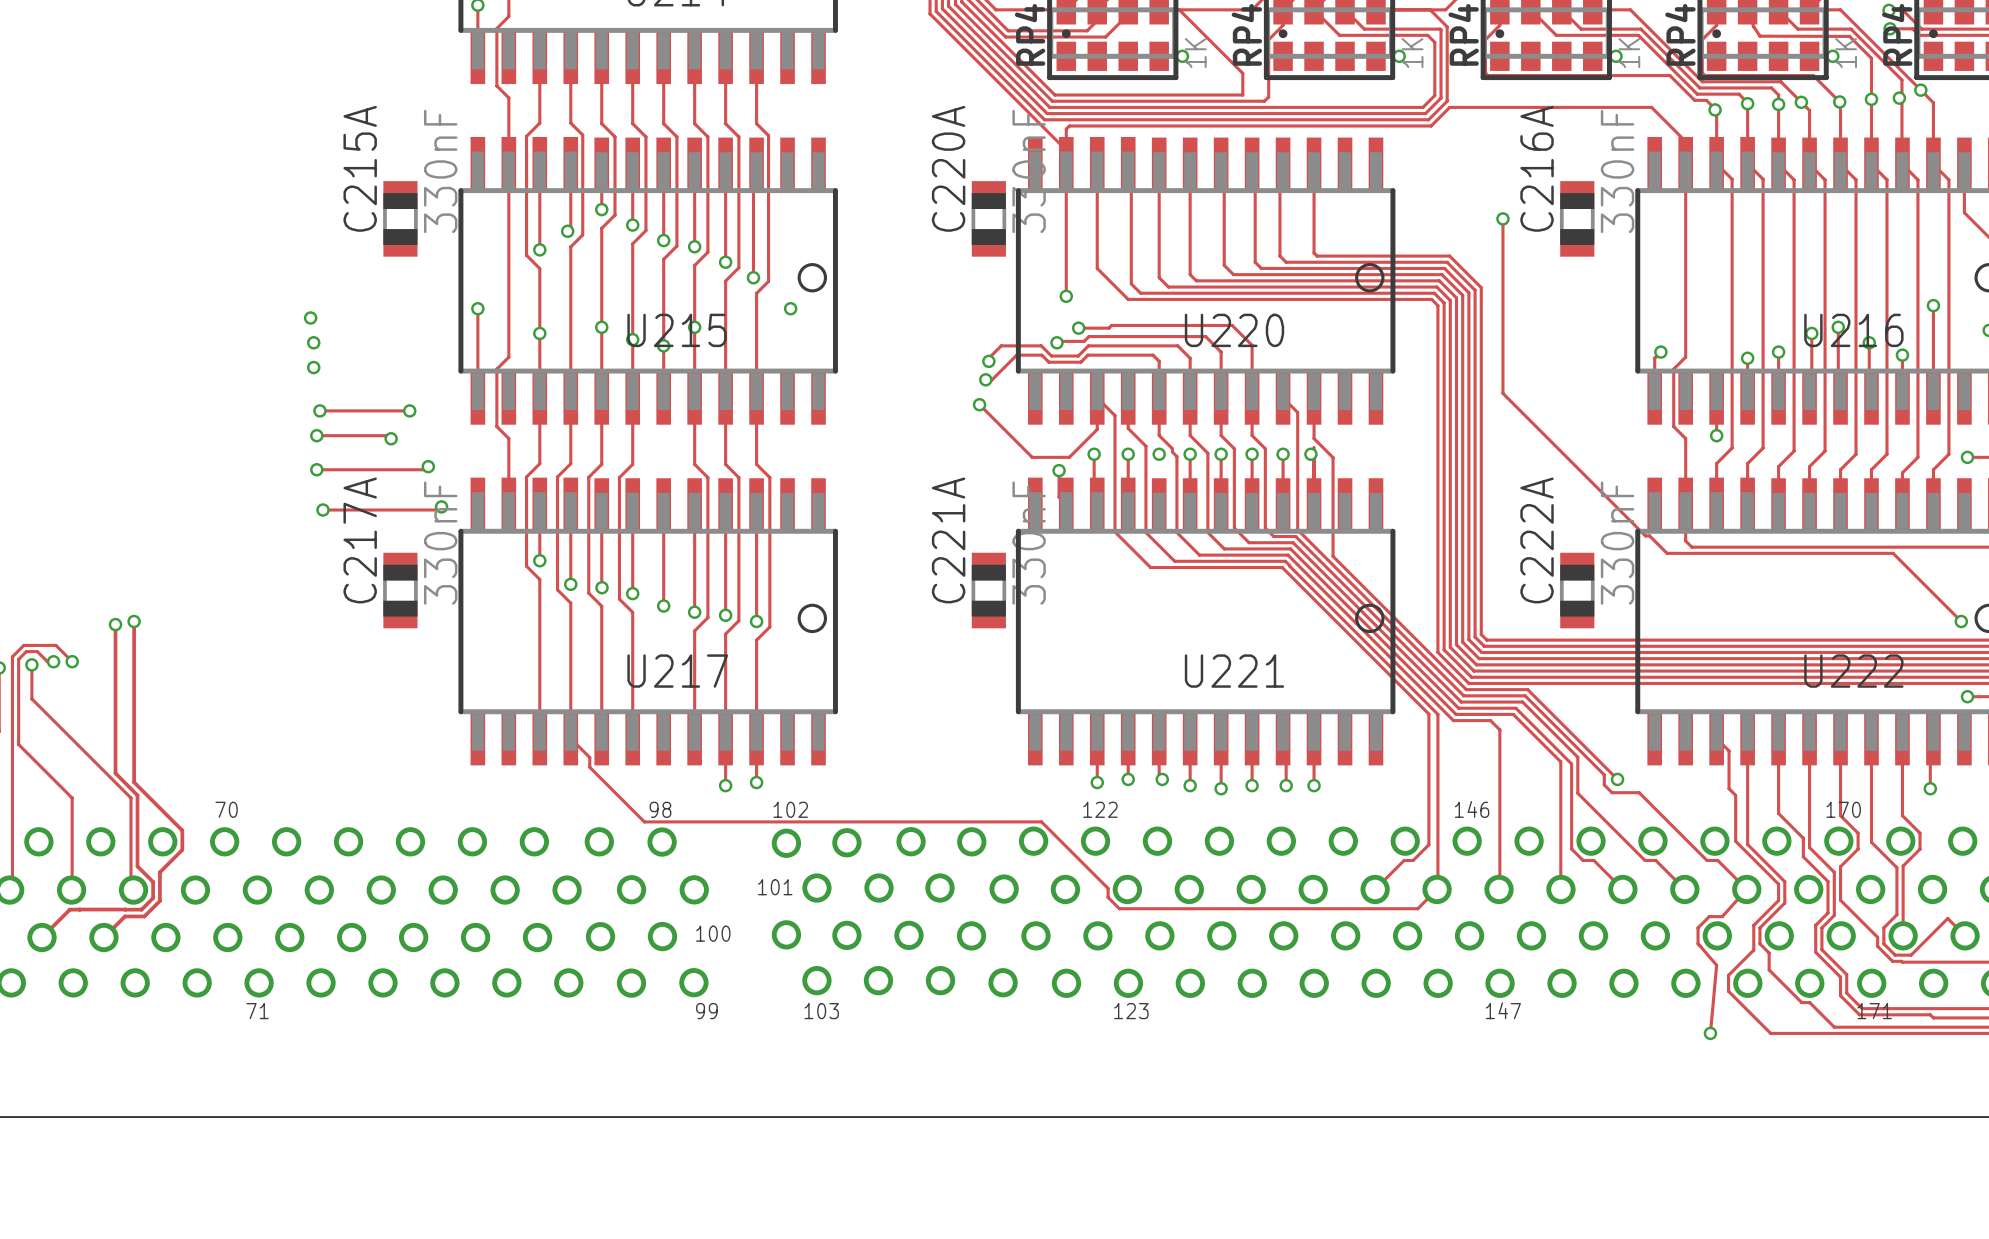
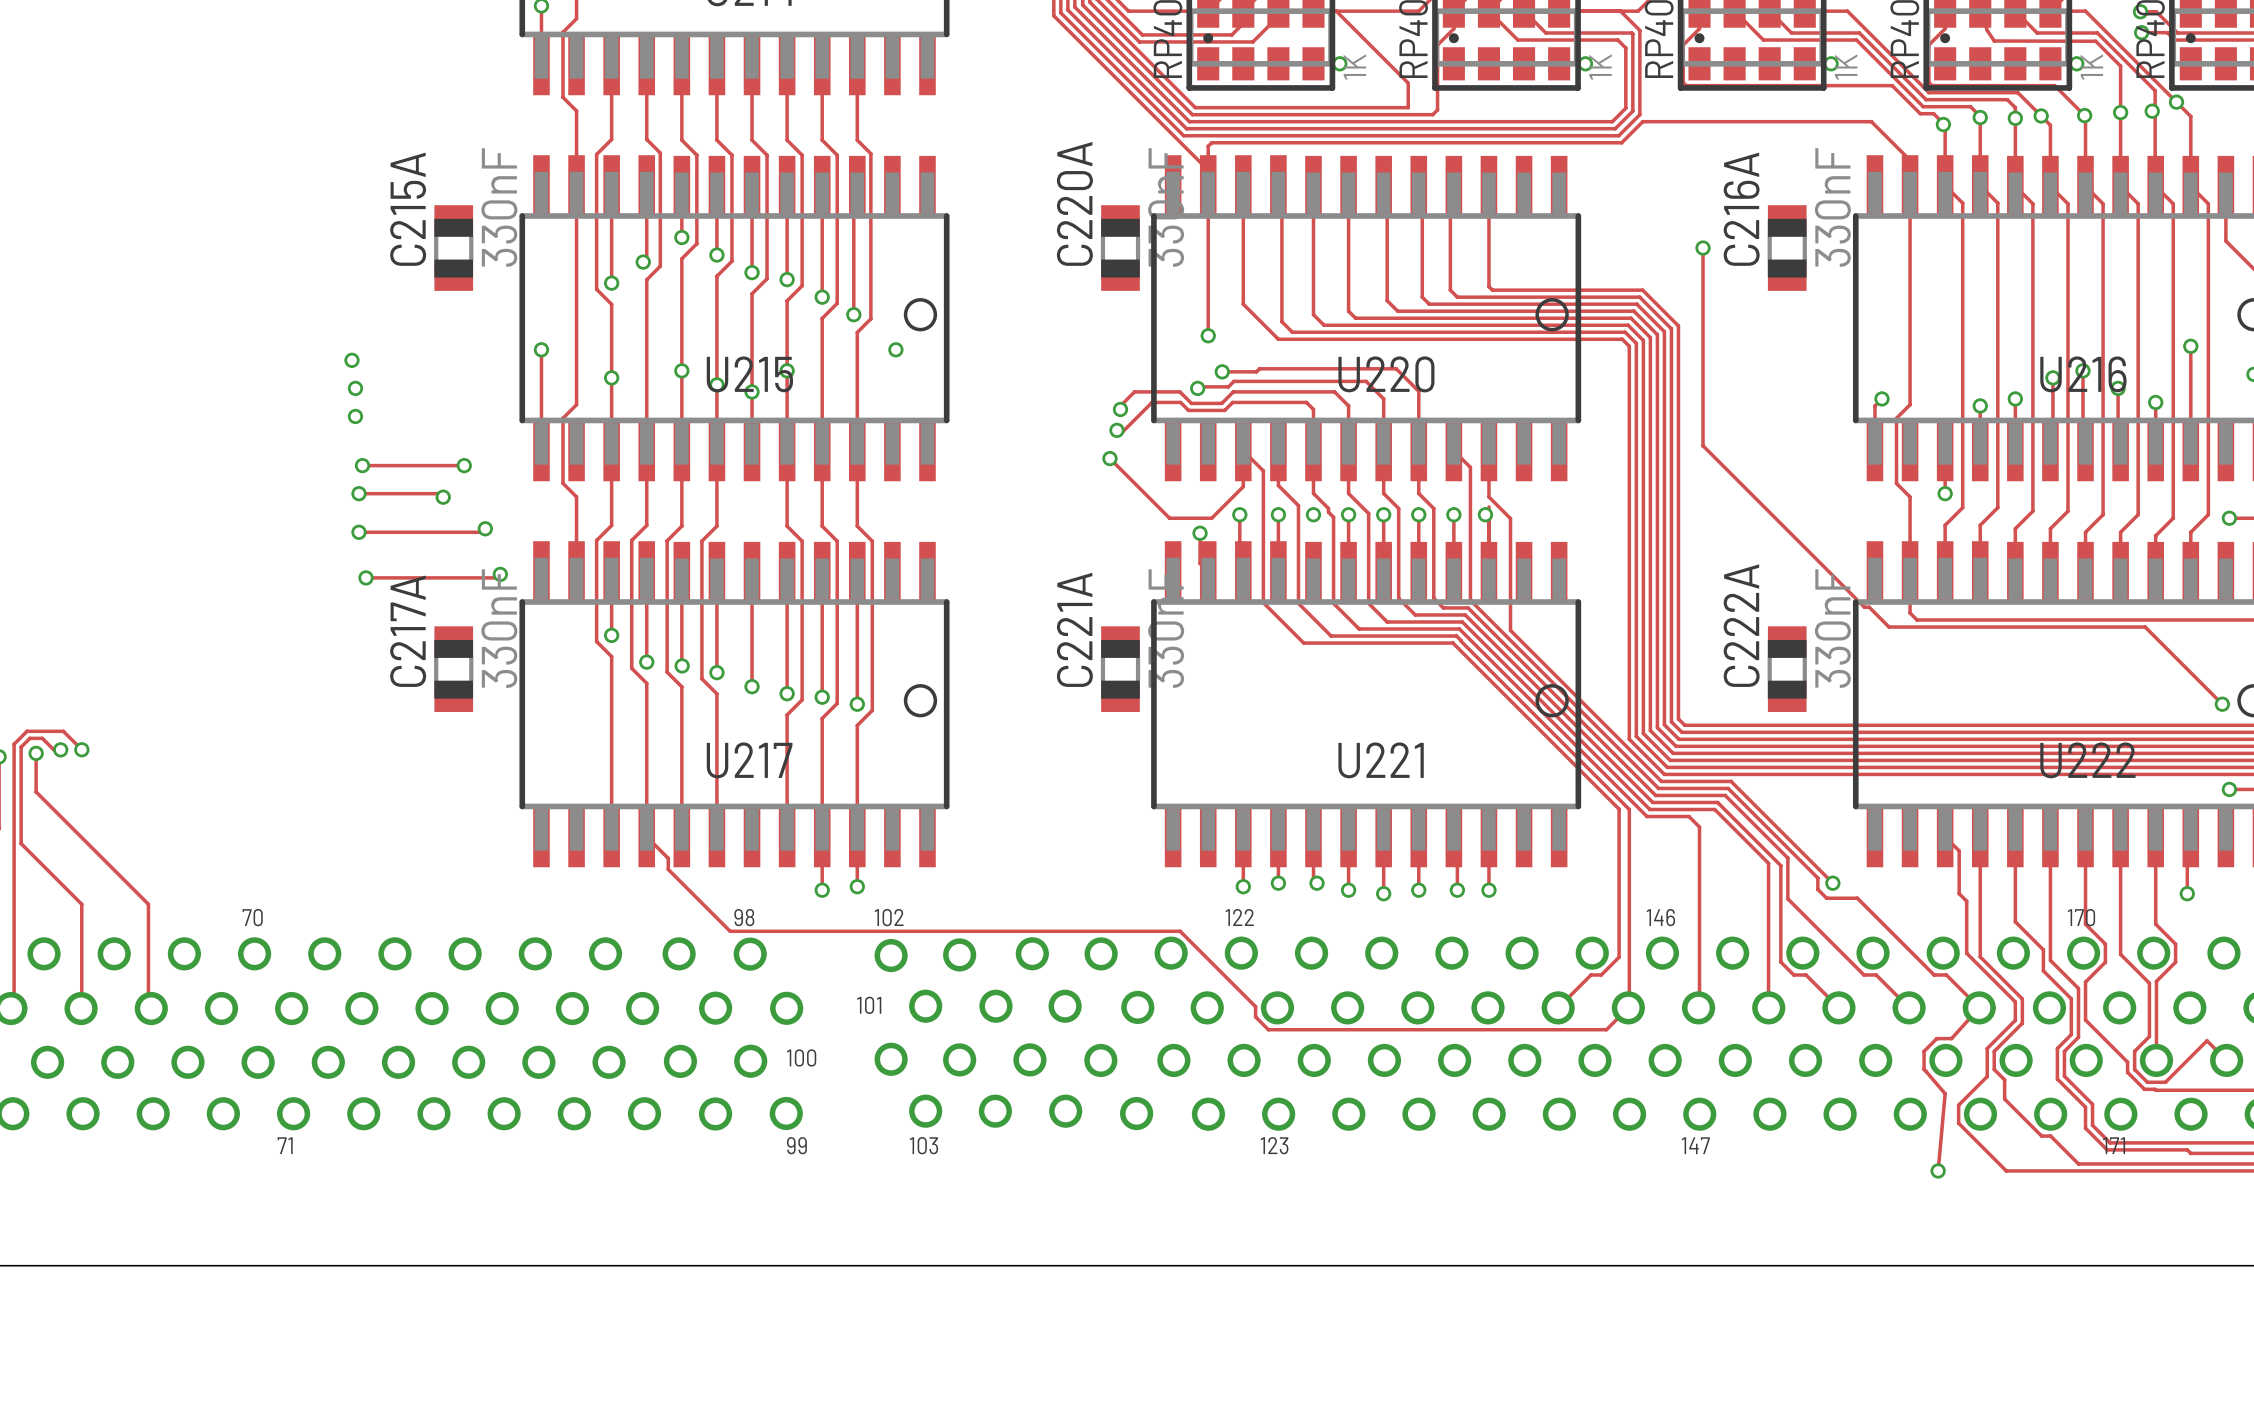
track: (134, 621) (134, 782) (182, 830) (182, 849) (159, 872) (159, 900) (144, 916) (124, 916) (103, 937) -> none
via: (134, 621) -> none
track: (115, 624) (115, 773) (137, 795) (137, 866) (153, 881) (153, 898) (141, 909) (125, 909) -> none
via: (115, 624) -> none
track: (79, 909) (125, 909) -> none
track: (79, 909) (69, 909) (41, 937) -> none

